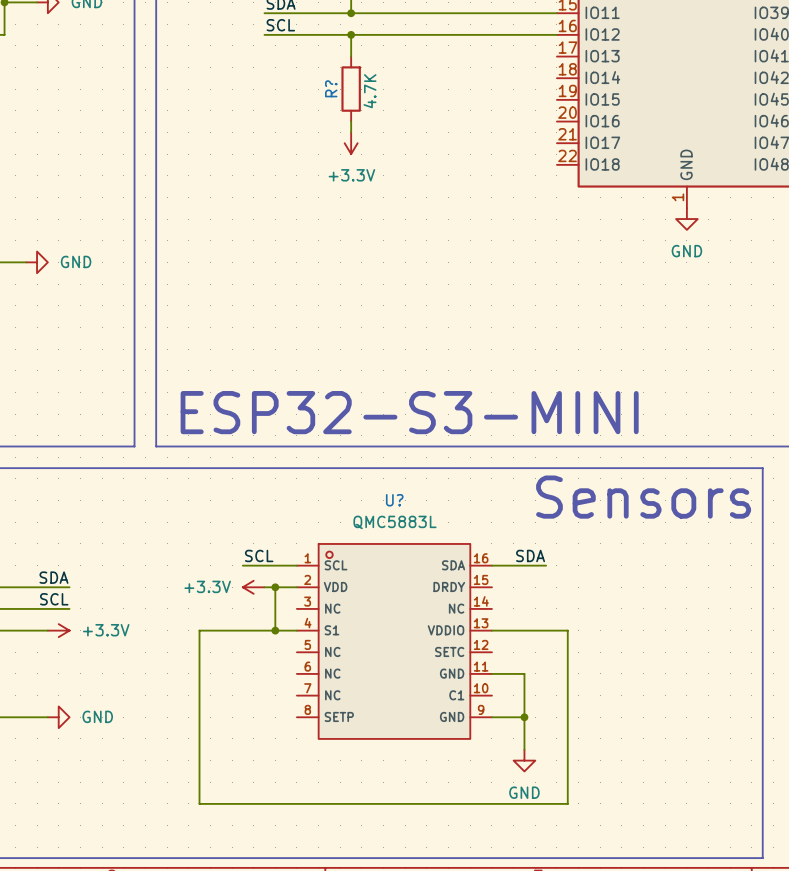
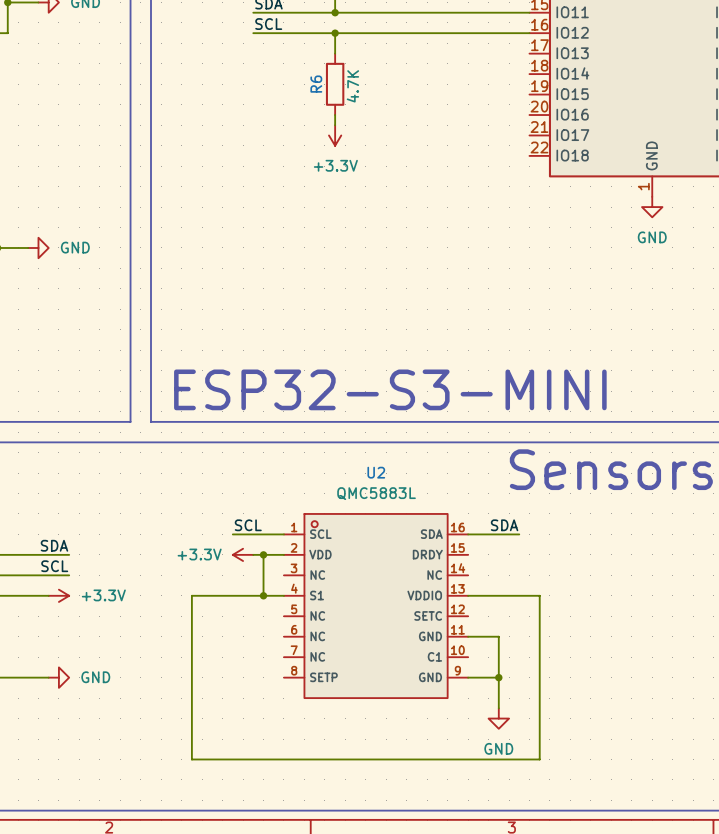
R? name: R? (331, 88) -> R6 (316, 84)
U? name: U? (394, 500) -> U2 (376, 472)

